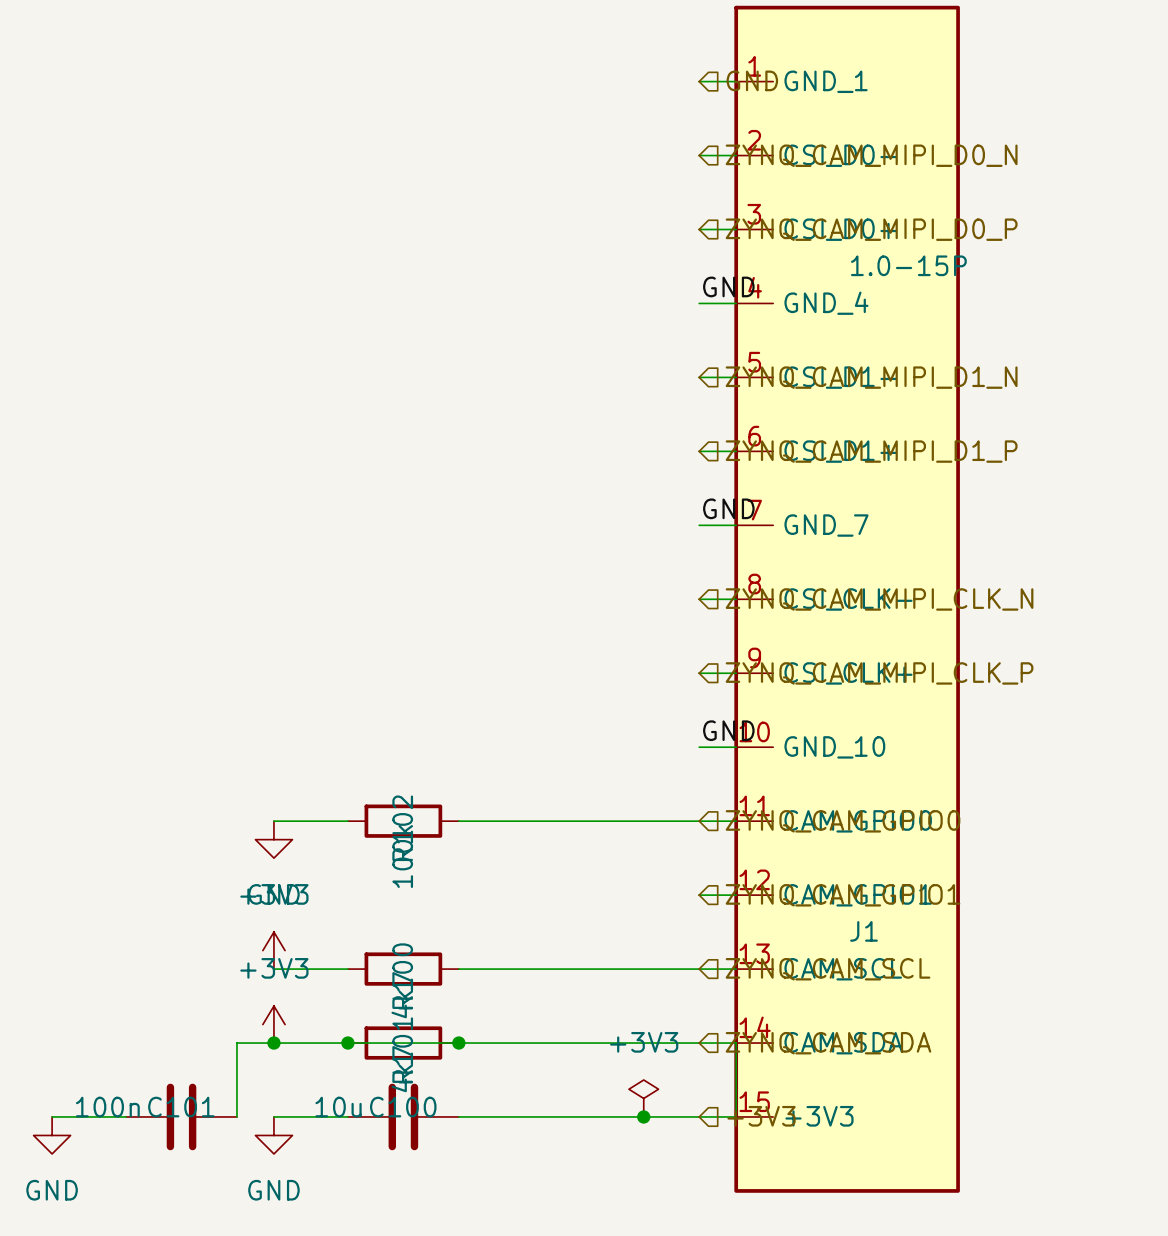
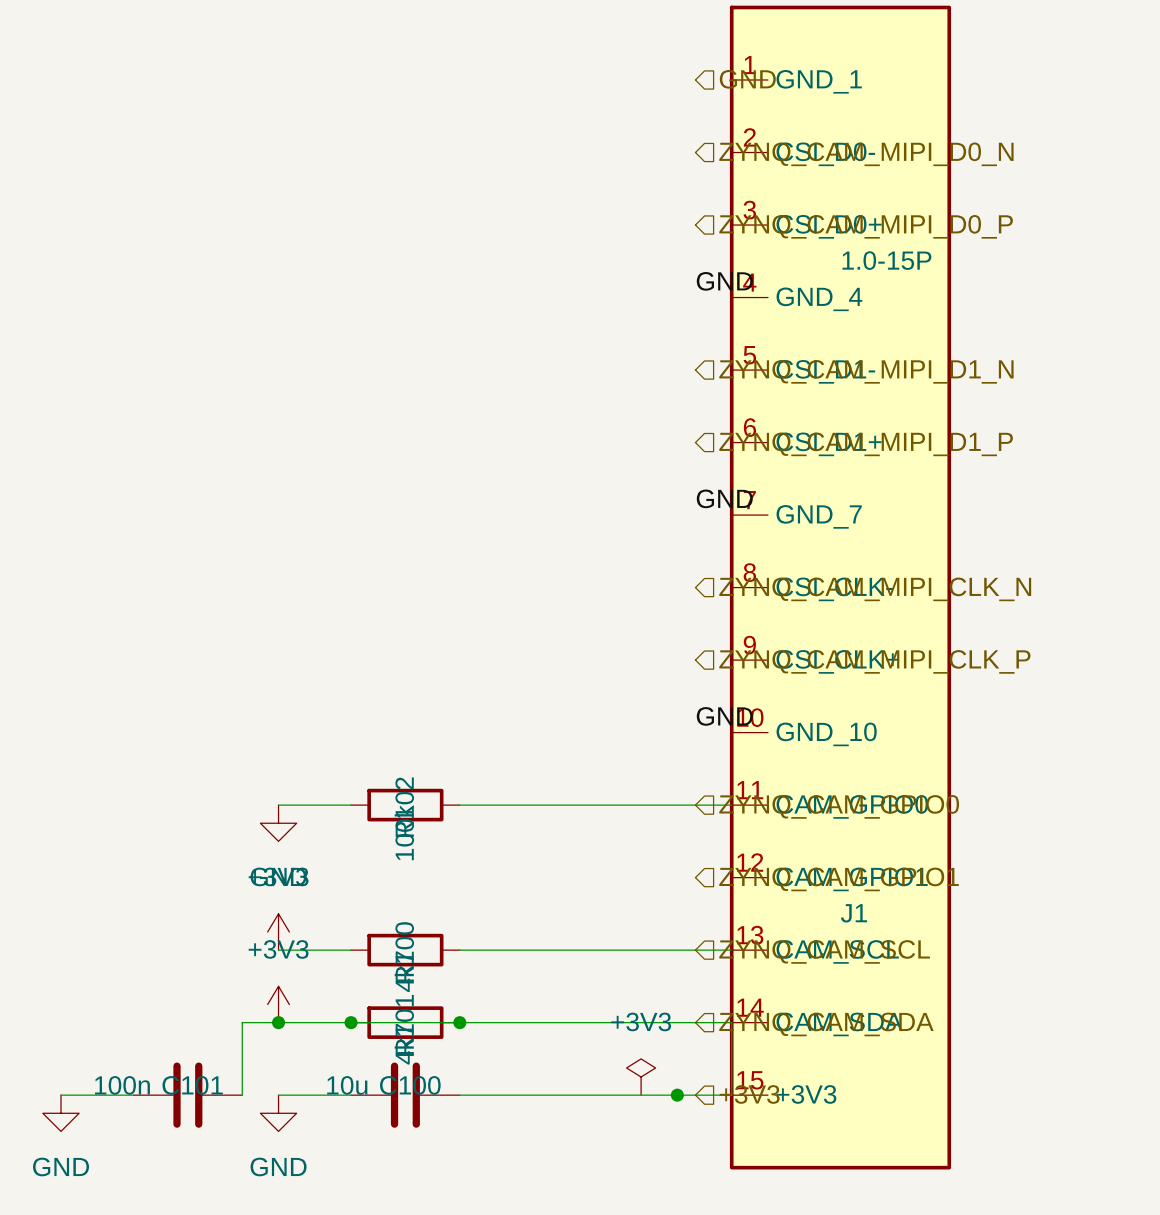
wire: (699, 81) (736, 81) -> none
wire: (699, 155) (736, 155) -> none
wire: (699, 229) (736, 229) -> none
wire: (699, 303) (736, 303) -> none
wire: (699, 377) (736, 377) -> none
wire: (699, 451) (736, 451) -> none
wire: (699, 525) (736, 525) -> none
wire: (699, 599) (736, 599) -> none
wire: (699, 673) (736, 673) -> none
wire: (699, 747) (736, 747) -> none
wire: (699, 895) (736, 895) -> none
junction position: (643, 1116) -> (677, 1095)

